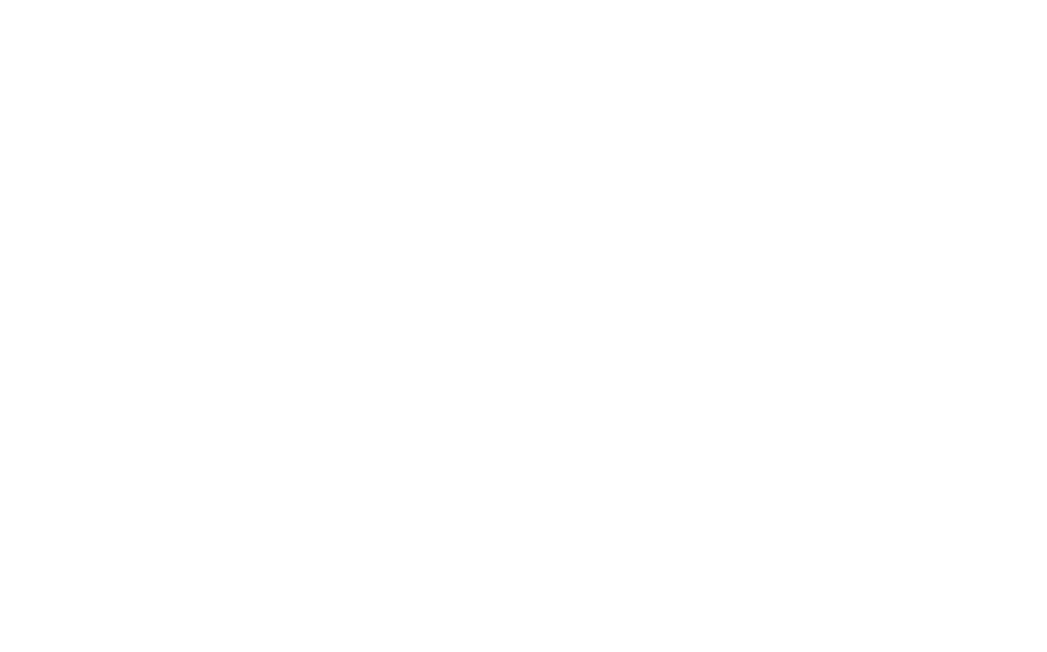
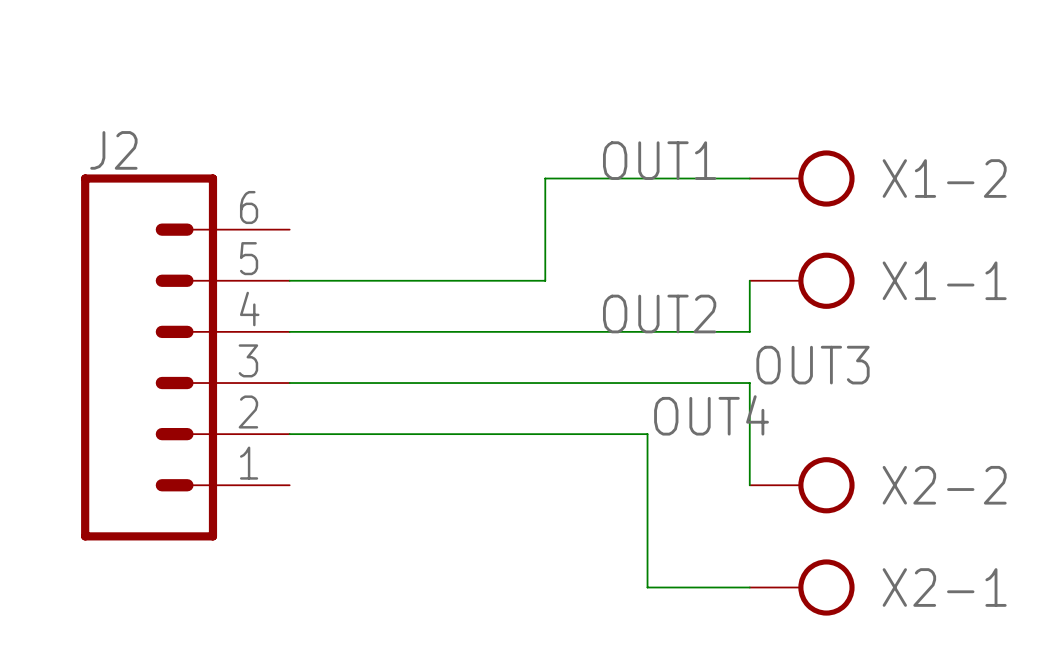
label: none -> OUT1 (659, 160)
wire: none -> (749, 178) (545, 178) (545, 280) (289, 280)
X1-2: none -> (802, 178)
wire: none -> (749, 280) (749, 331) (289, 331)
X1-1: none -> (802, 280)
label: none -> OUT2 (659, 313)
J2: none -> (185, 357)
label: none -> OUT3 (813, 365)
wire: none -> (289, 383) (749, 383) (749, 485)
label: none -> OUT4 (711, 415)
wire: none -> (289, 434) (647, 434) (647, 587) (749, 587)
X2-2: none -> (802, 485)
X2-1: none -> (802, 587)

